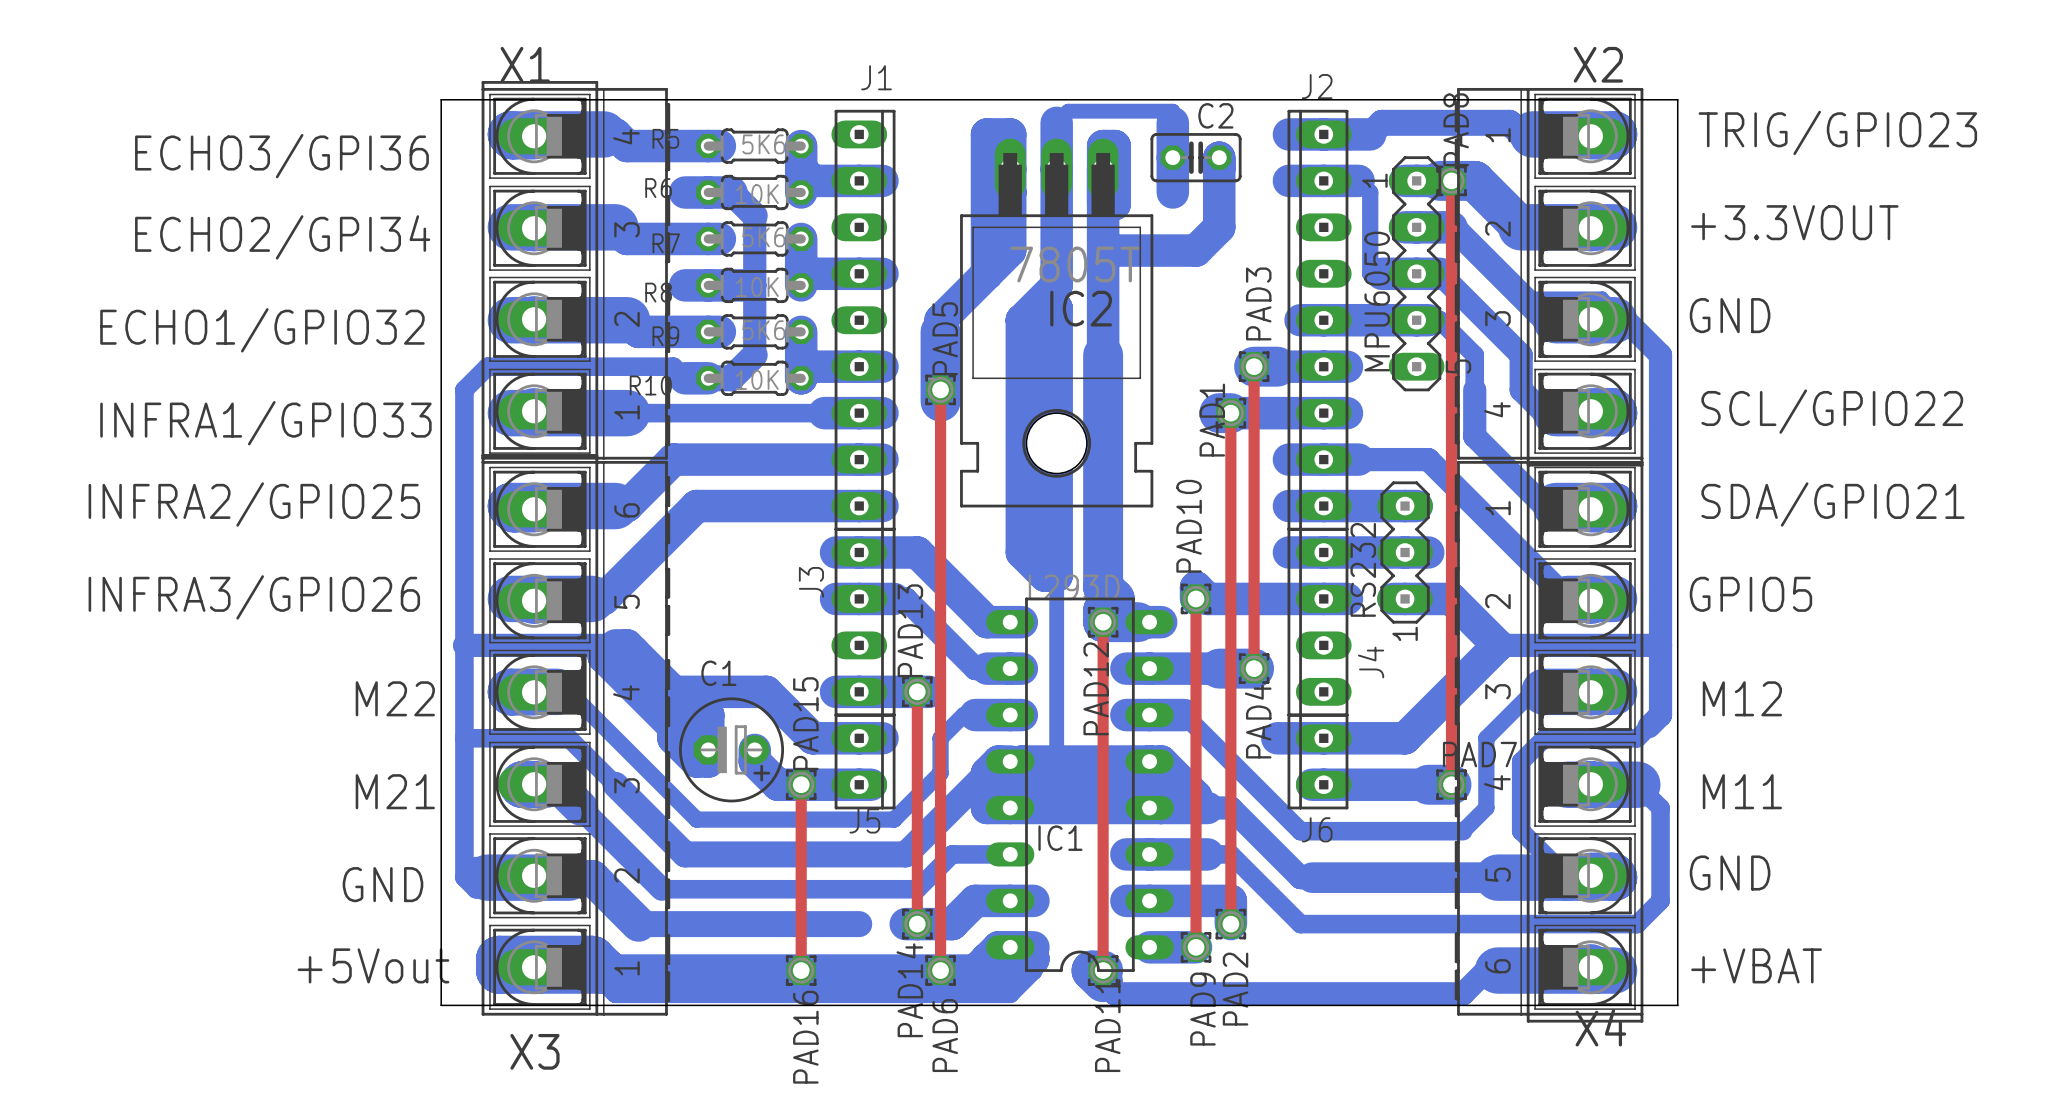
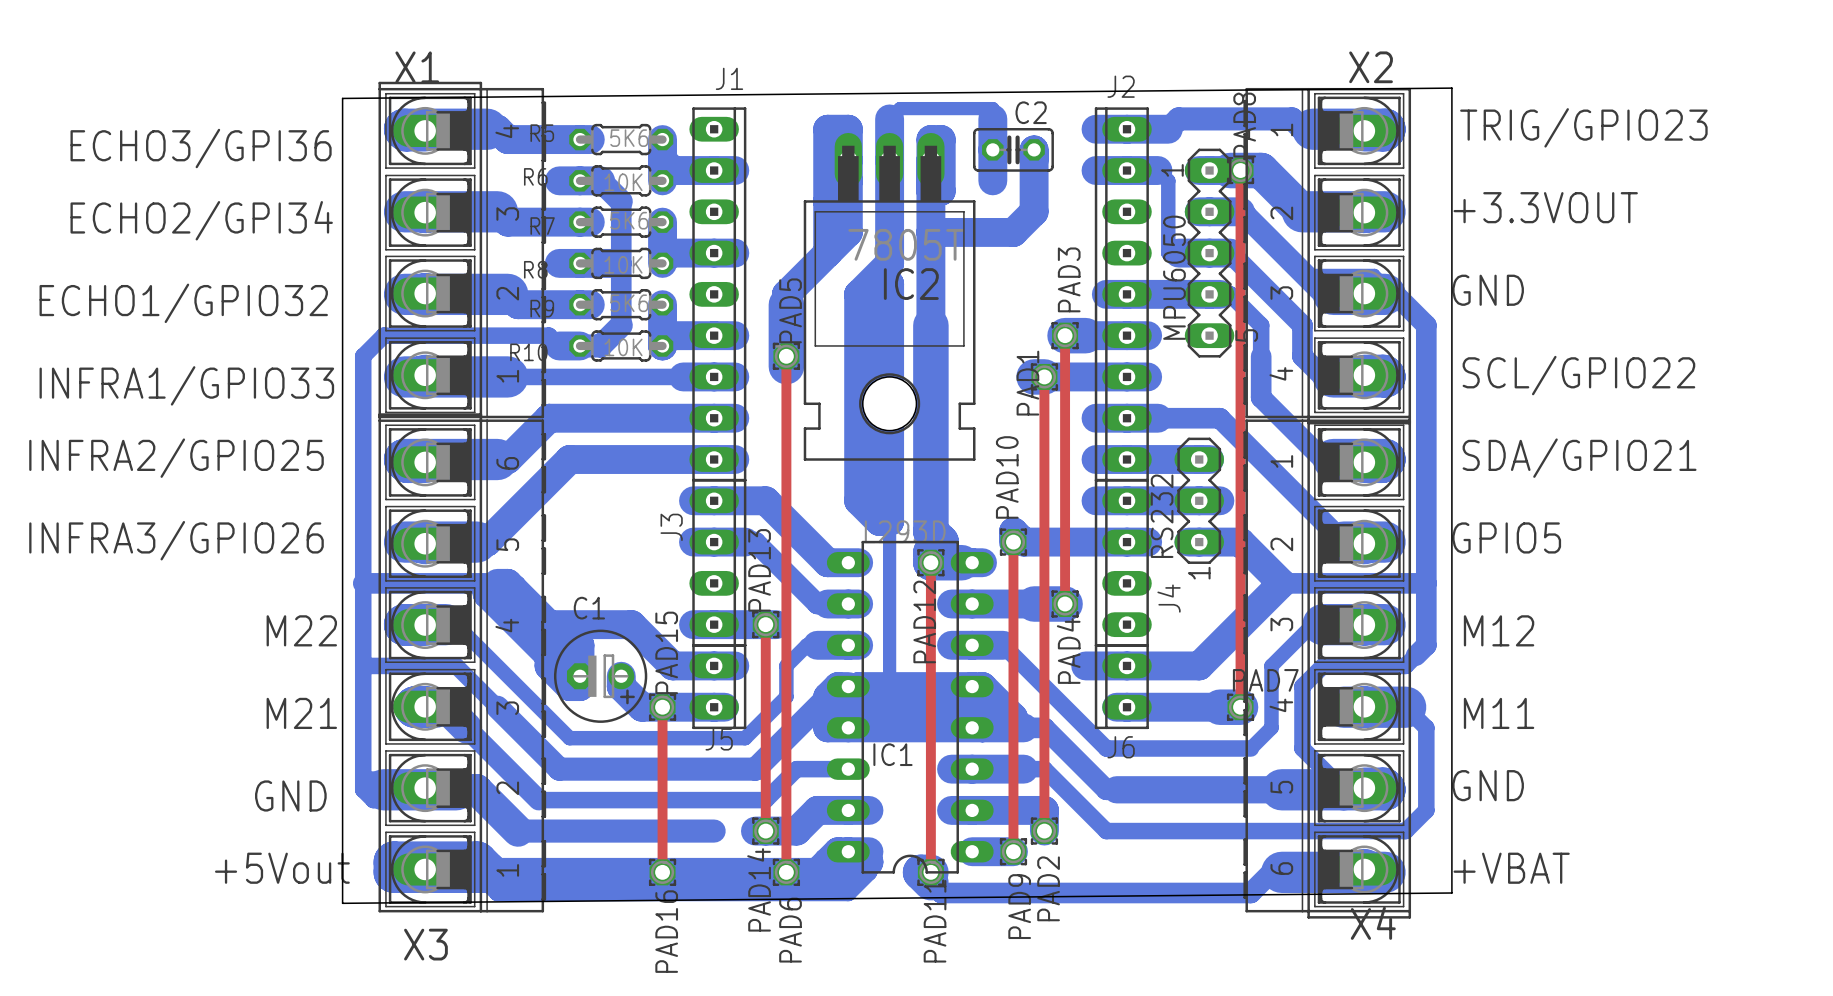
board edge: (441, 99) (1677, 99) (1677, 1005) (441, 1005) -> (342, 98) (1451, 88) (1451, 893) (342, 903)

